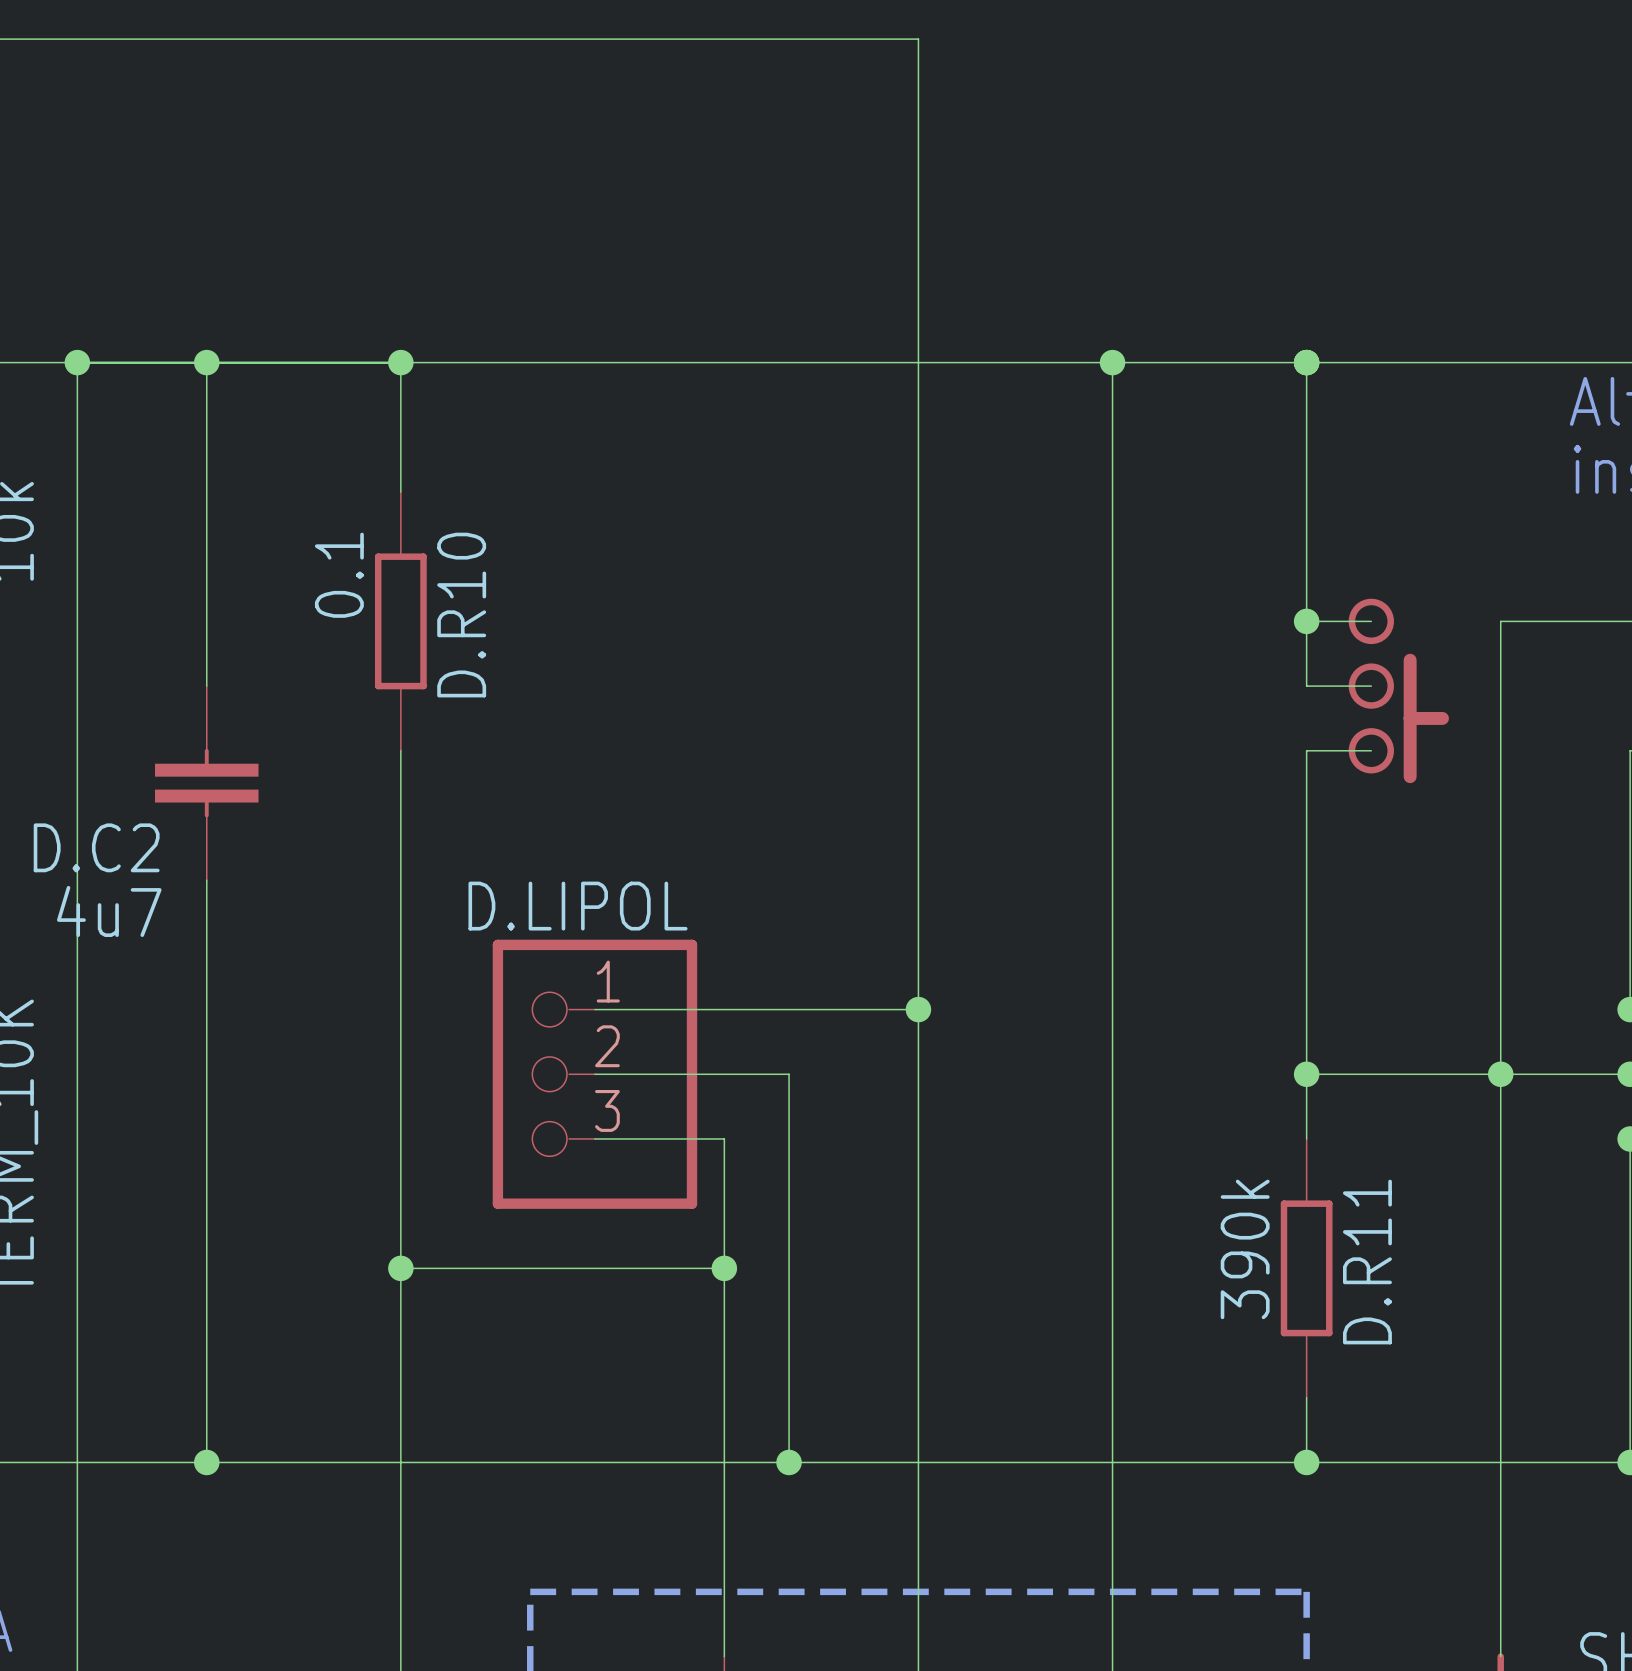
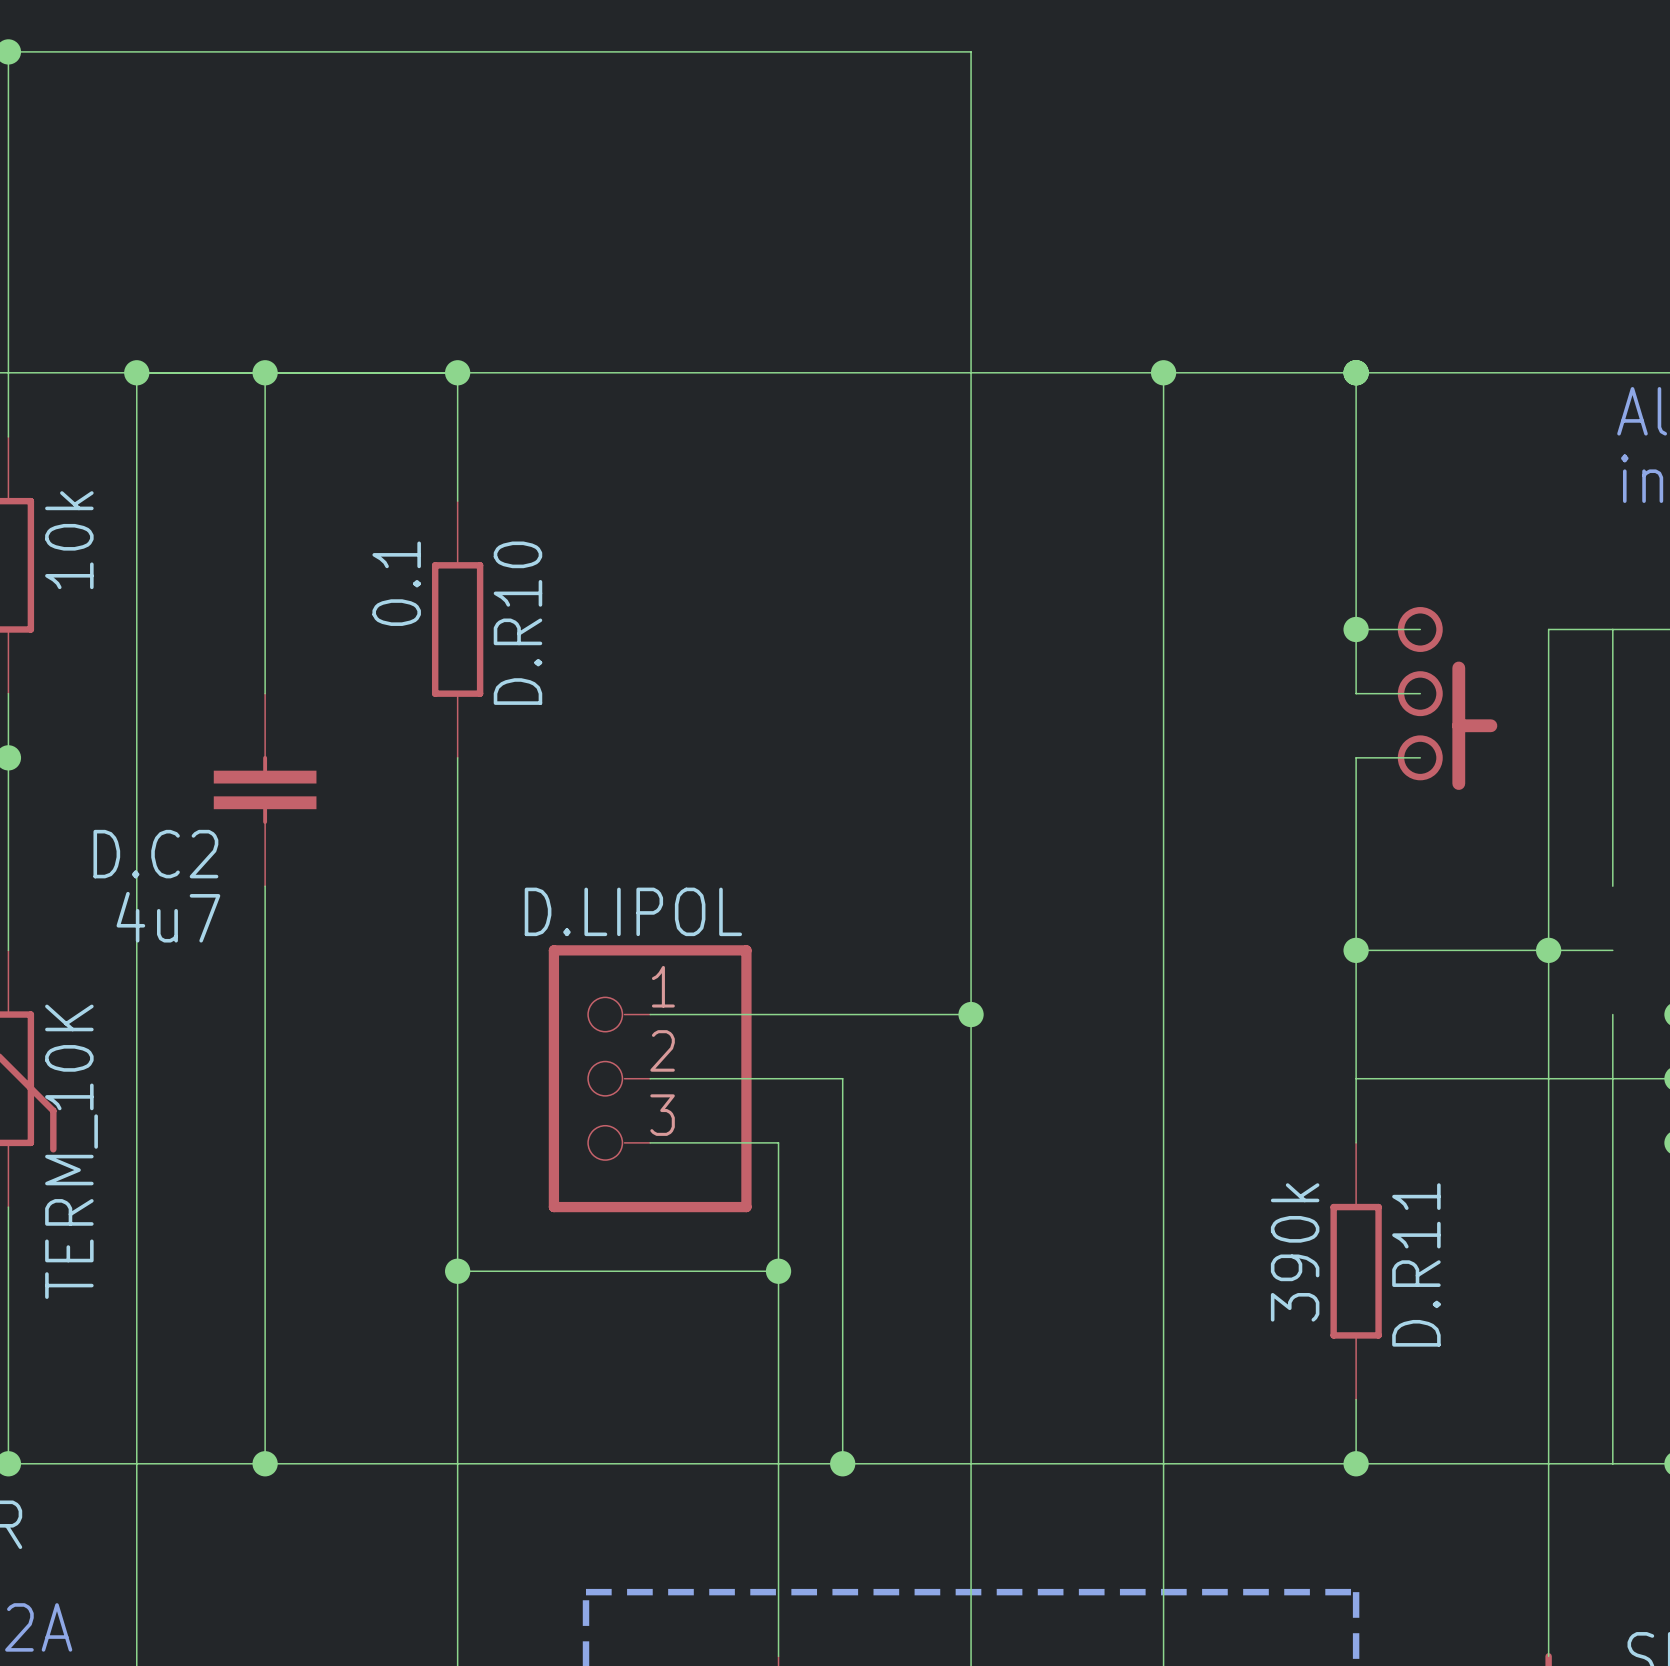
wire: none -> (1612, 629) (1612, 886)
wire: none -> (1356, 950) (1612, 950)
junction: none -> (1356, 950)
junction: none -> (1548, 950)
wire: none -> (1612, 1014) (1612, 1463)
junction: (1306, 1074) -> none
junction: (1500, 1074) -> none

